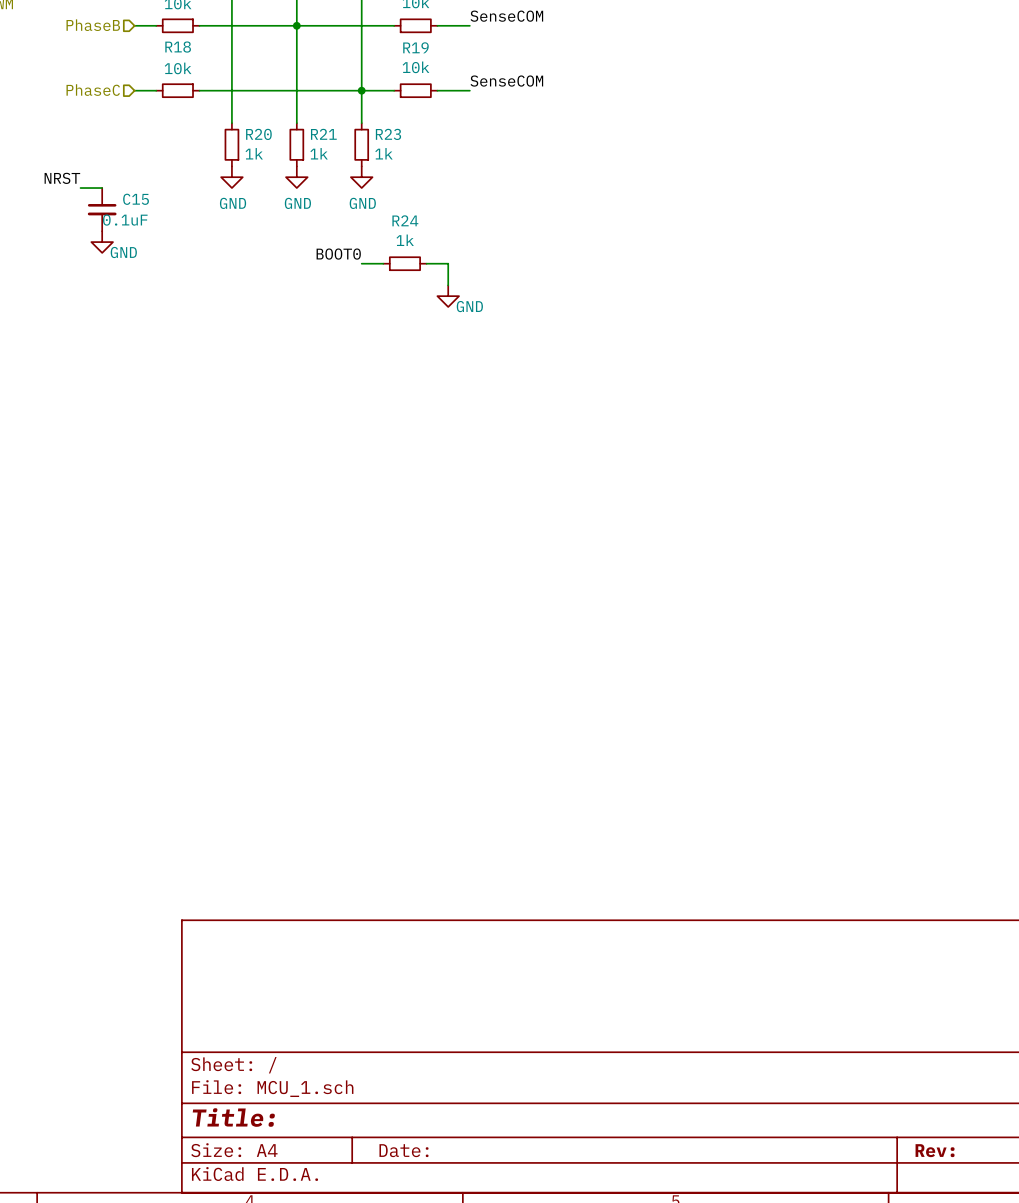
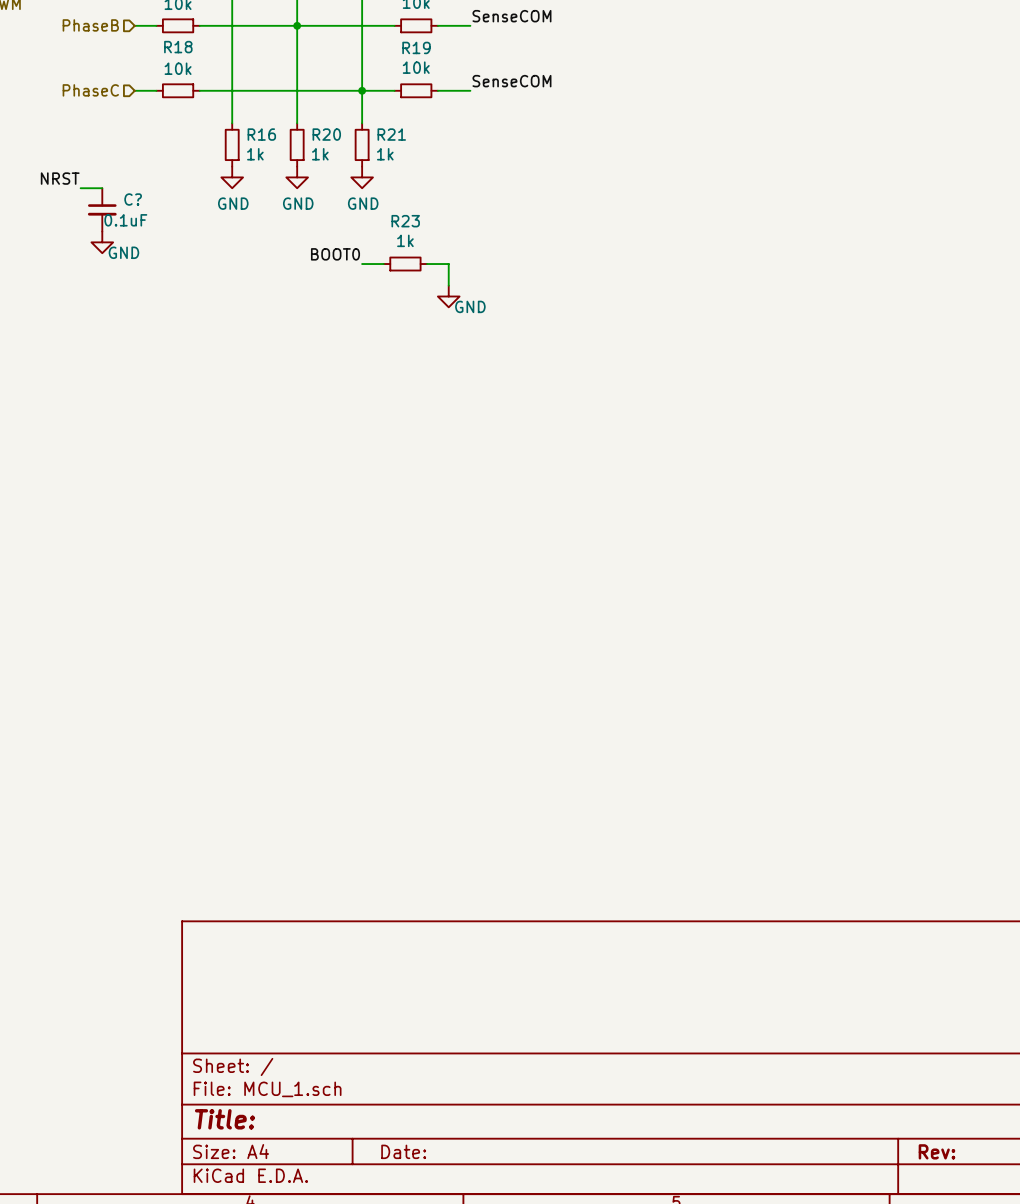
R20 name: R20 (258, 134) -> R16 (261, 134)
R21 name: R21 (323, 134) -> R20 (326, 134)
R23 name: R23 (388, 134) -> R21 (391, 134)
C15 name: C15 (136, 199) -> C? (133, 199)
R24 name: R24 (405, 220) -> R23 (405, 221)

